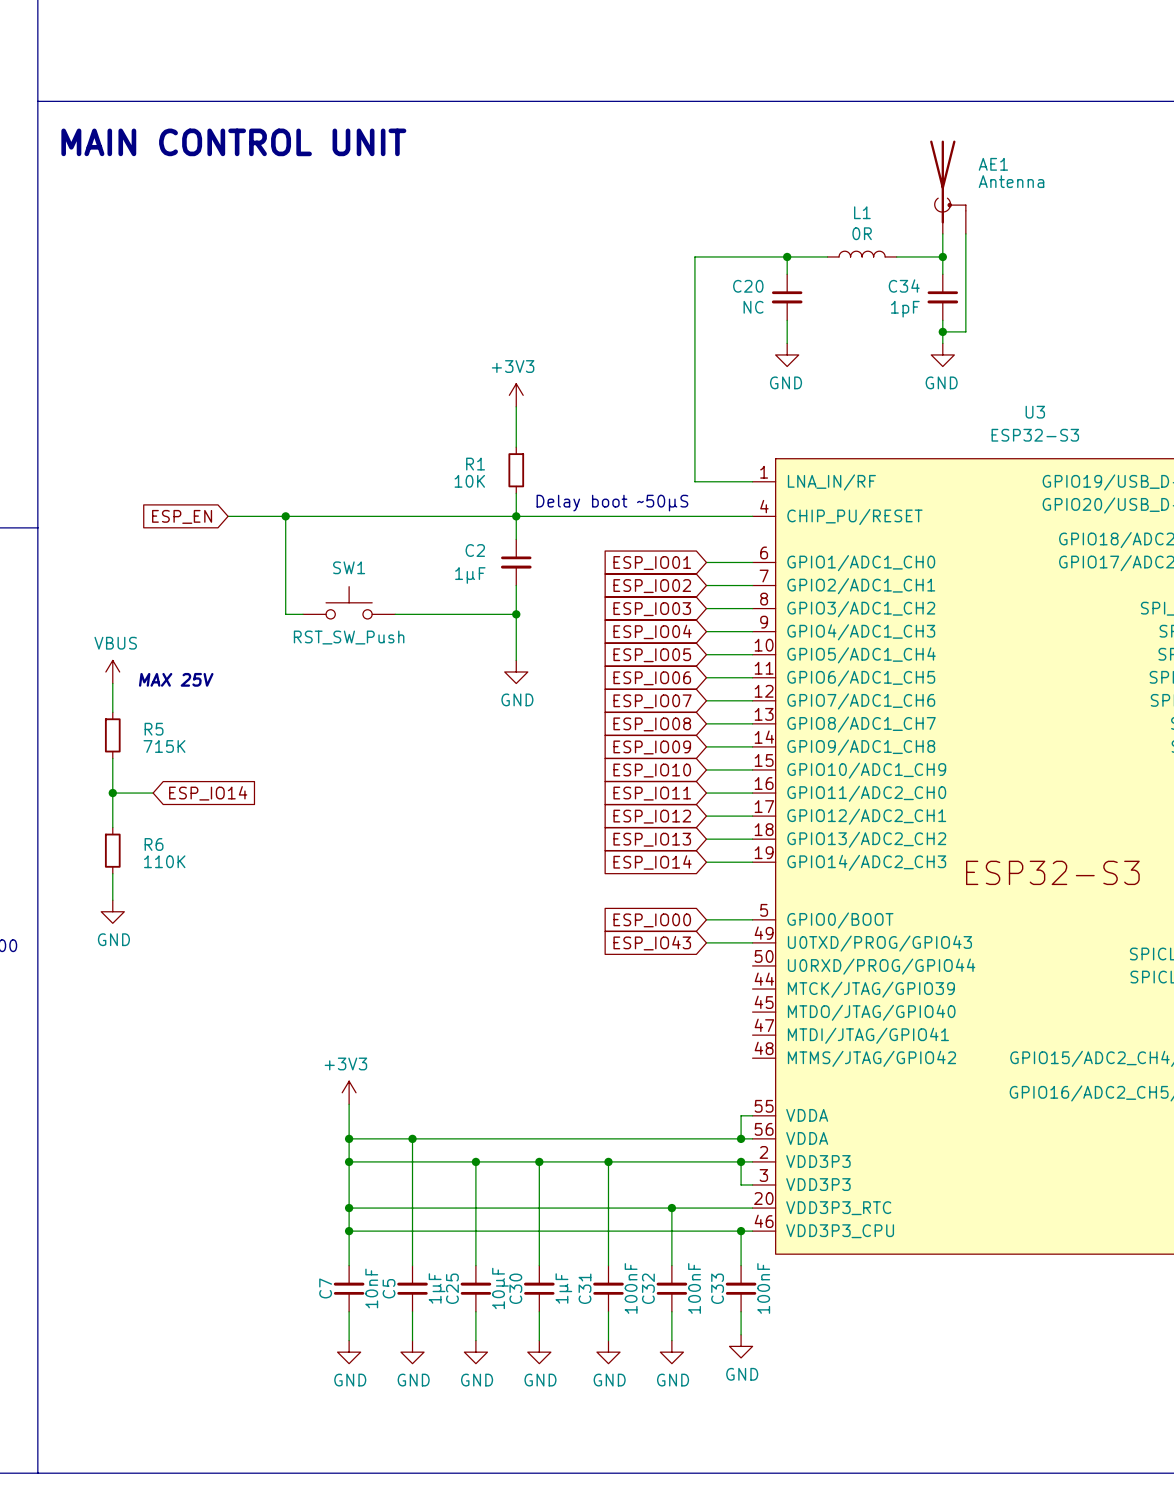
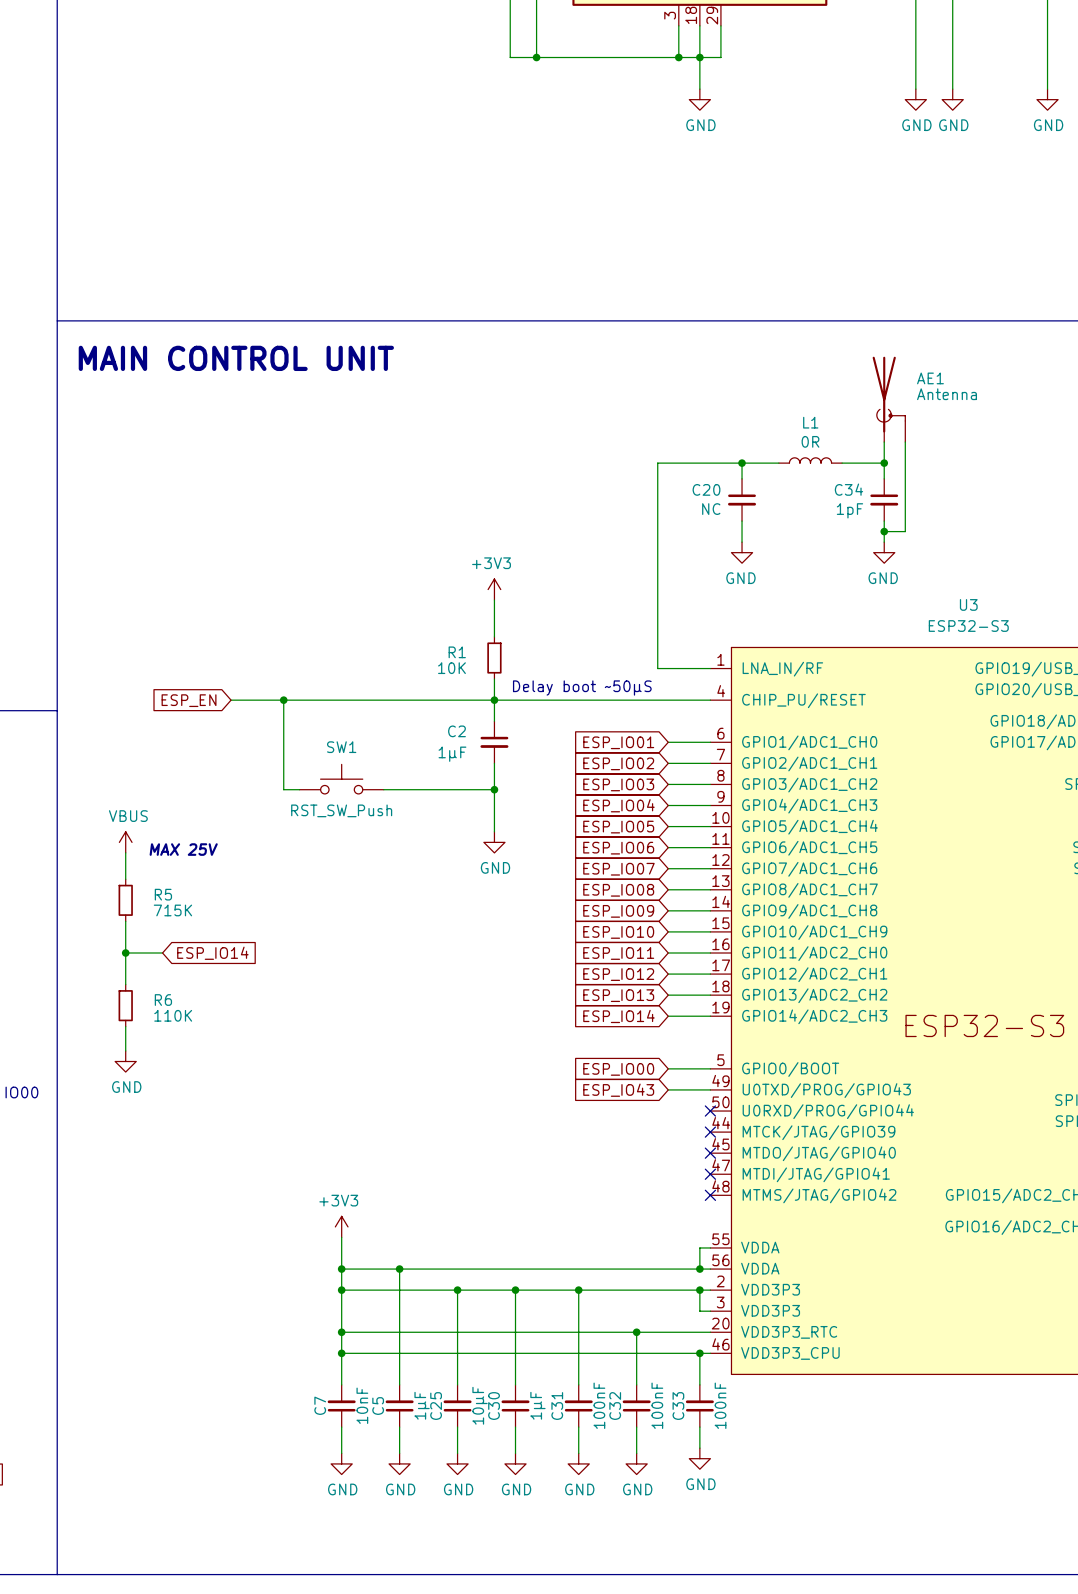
no-connect mark: none -> (710, 1111)
no-connect mark: none -> (710, 1132)
no-connect mark: none -> (710, 1153)
no-connect mark: none -> (710, 1174)
no-connect mark: none -> (710, 1195)

